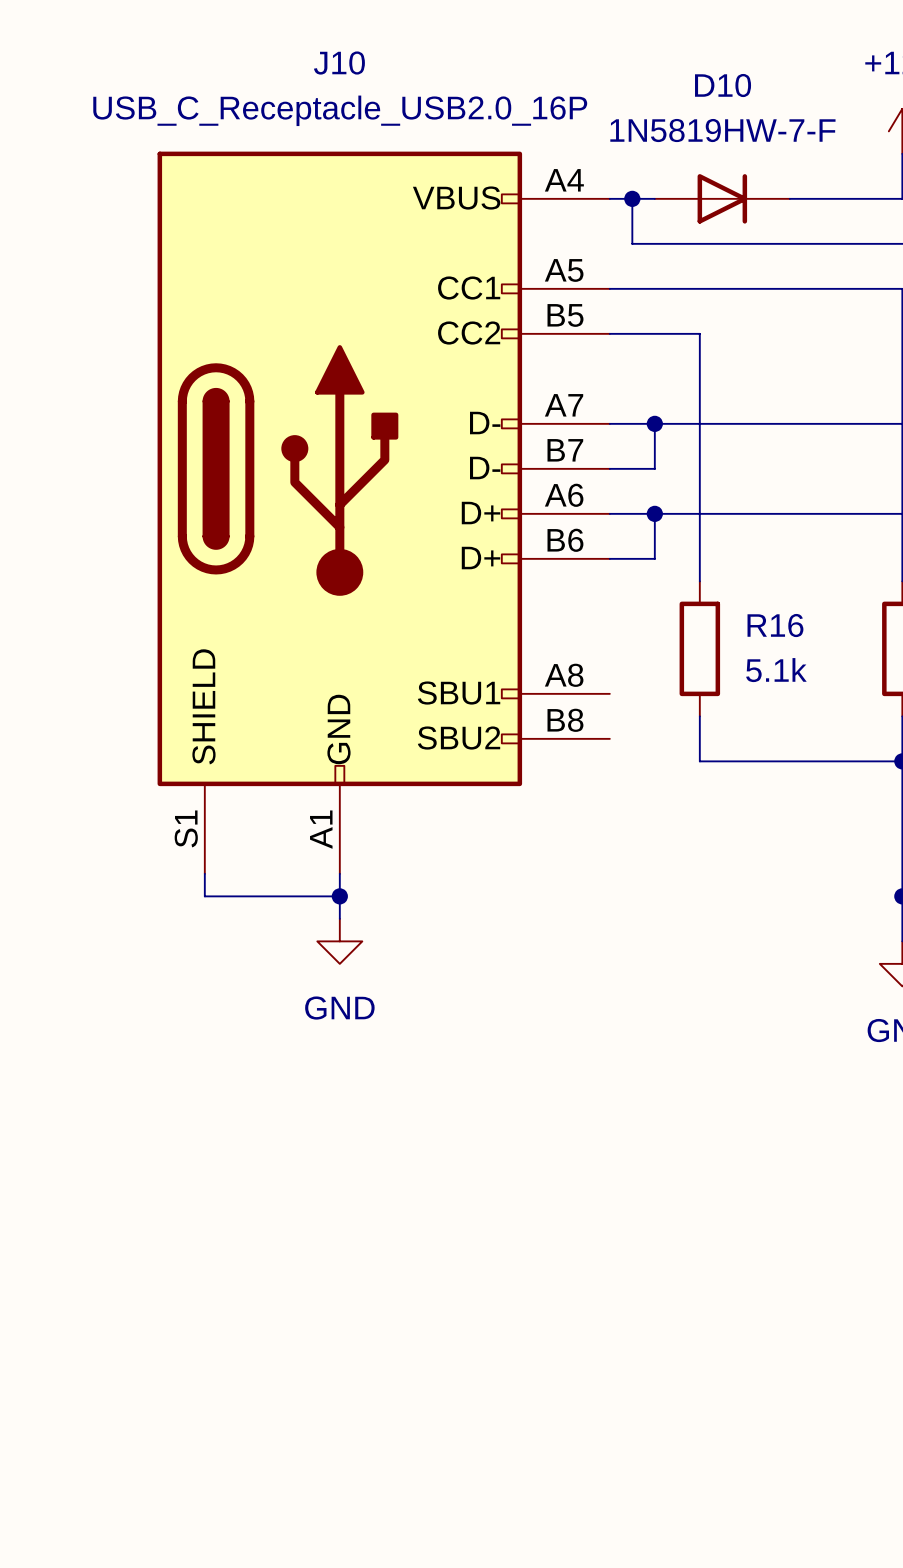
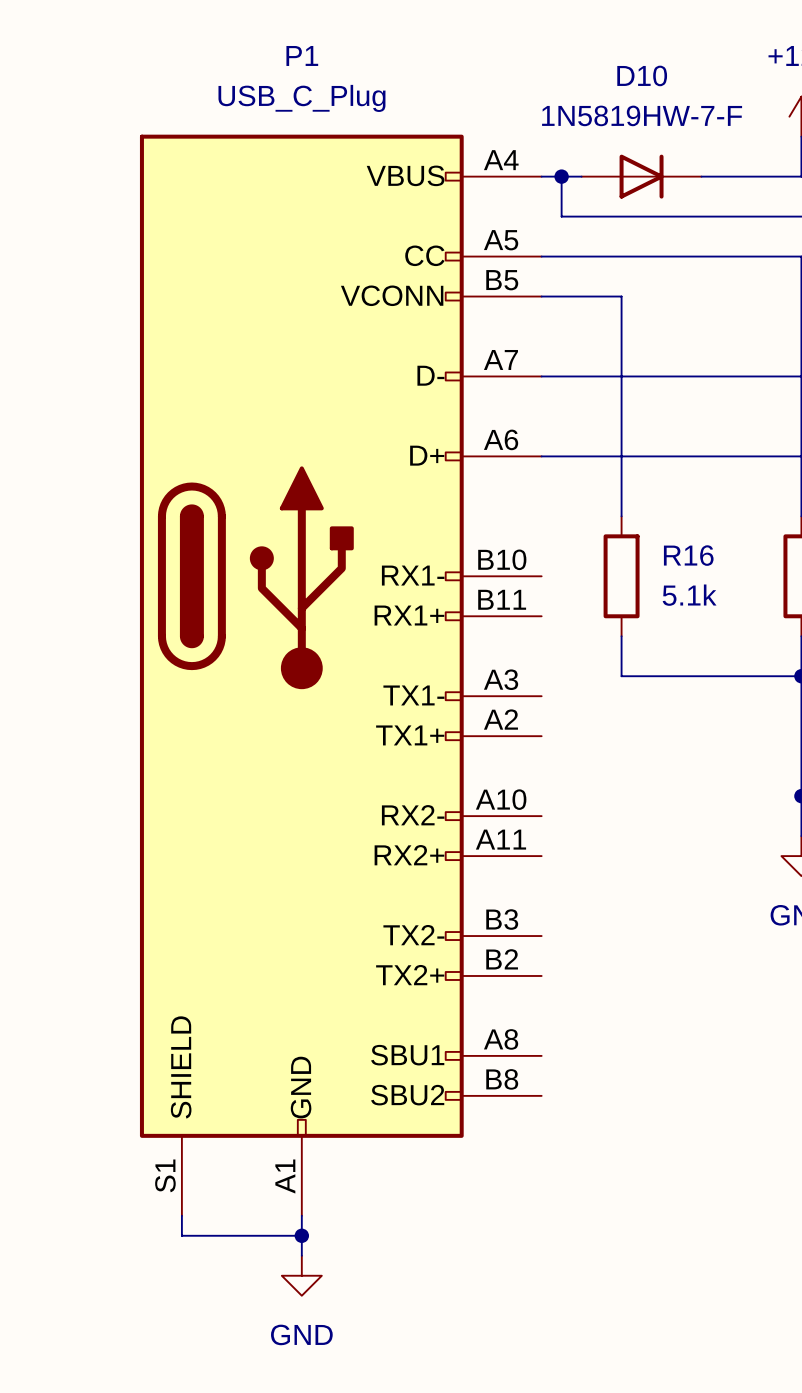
wire: (654, 423) (654, 468) (609, 468) -> none
junction: (654, 423) -> none
J10: USB_C_Receptacle_USB2.0_16P (383, 512) -> none
wire: (654, 513) (654, 558) (609, 558) -> none
junction: (654, 513) -> none
P1: none -> USB_C_Plug (340, 675)
junction: (339, 896) -> none
power symbol: GND (339, 941) -> none
wire: none -> (181, 1215) (181, 1235) (301, 1235)
wire: none -> (301, 1215) (301, 1255)
junction: none -> (301, 1235)
power symbol: none -> GND (301, 1275)

